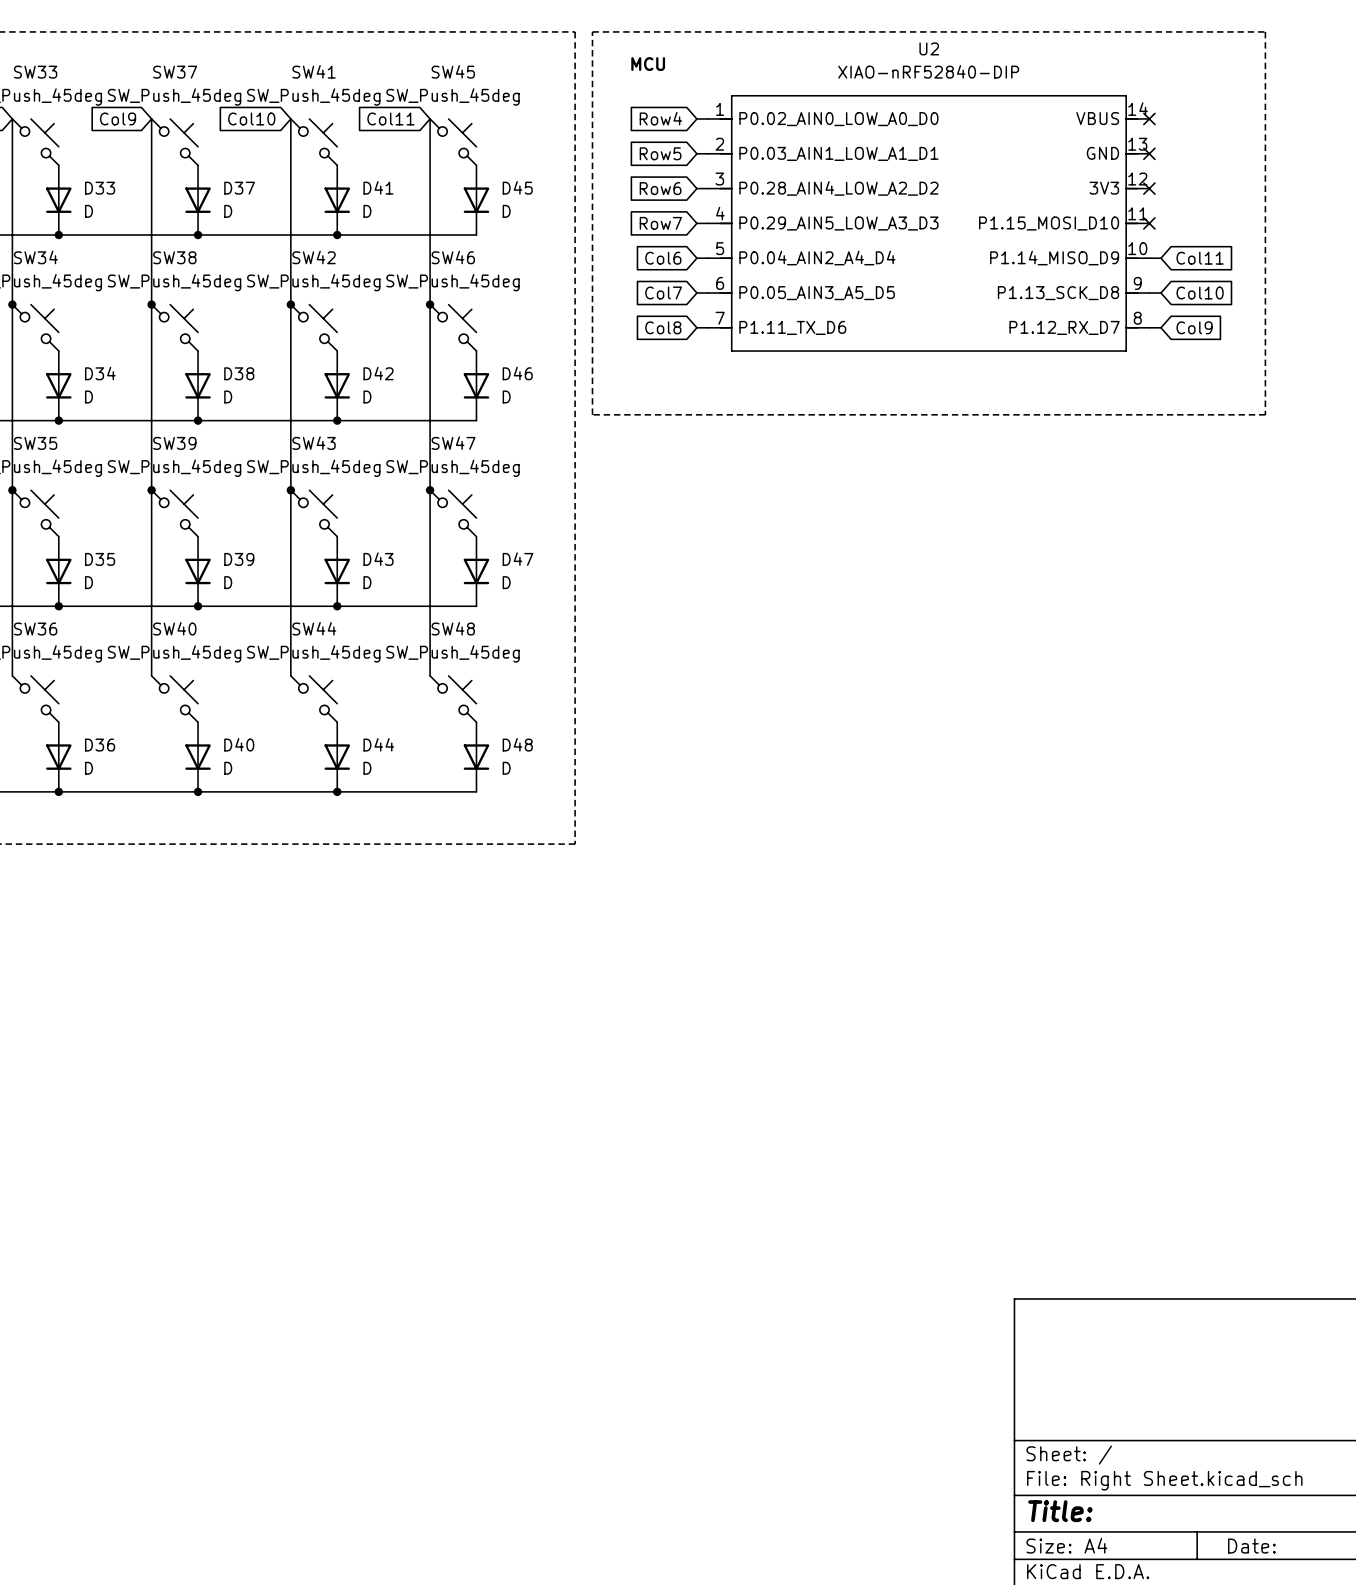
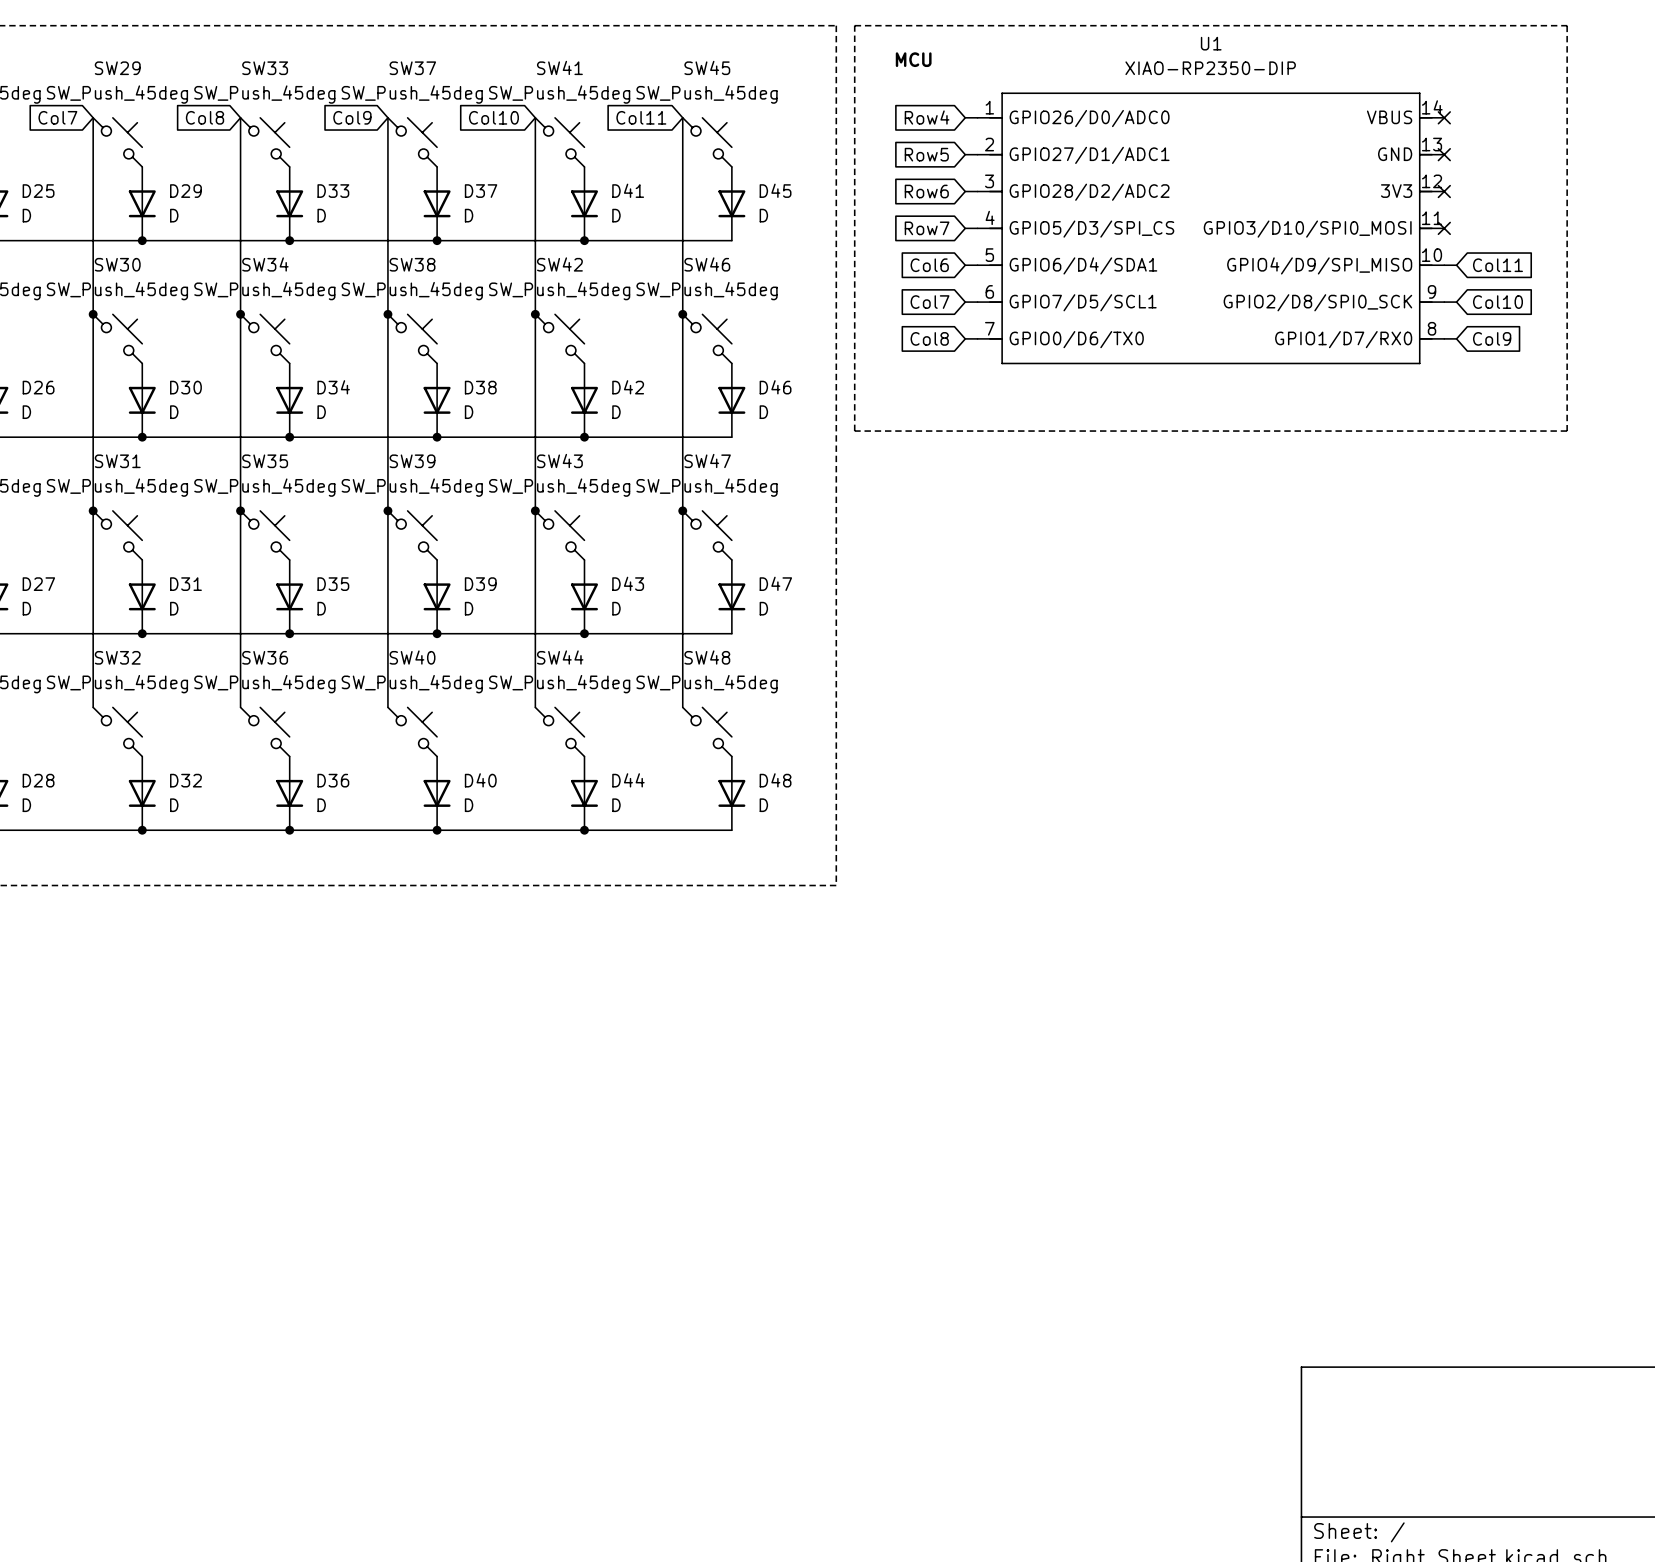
U2 name: U2 (929, 48) -> U1 (1211, 43)
U2 value: XIAO-nRF52840-DIP (928, 71) -> XIAO-RP2350-DIP (1210, 68)
U2 symbol: [708, 95, 1150, 352] -> [977, 92, 1445, 365]

